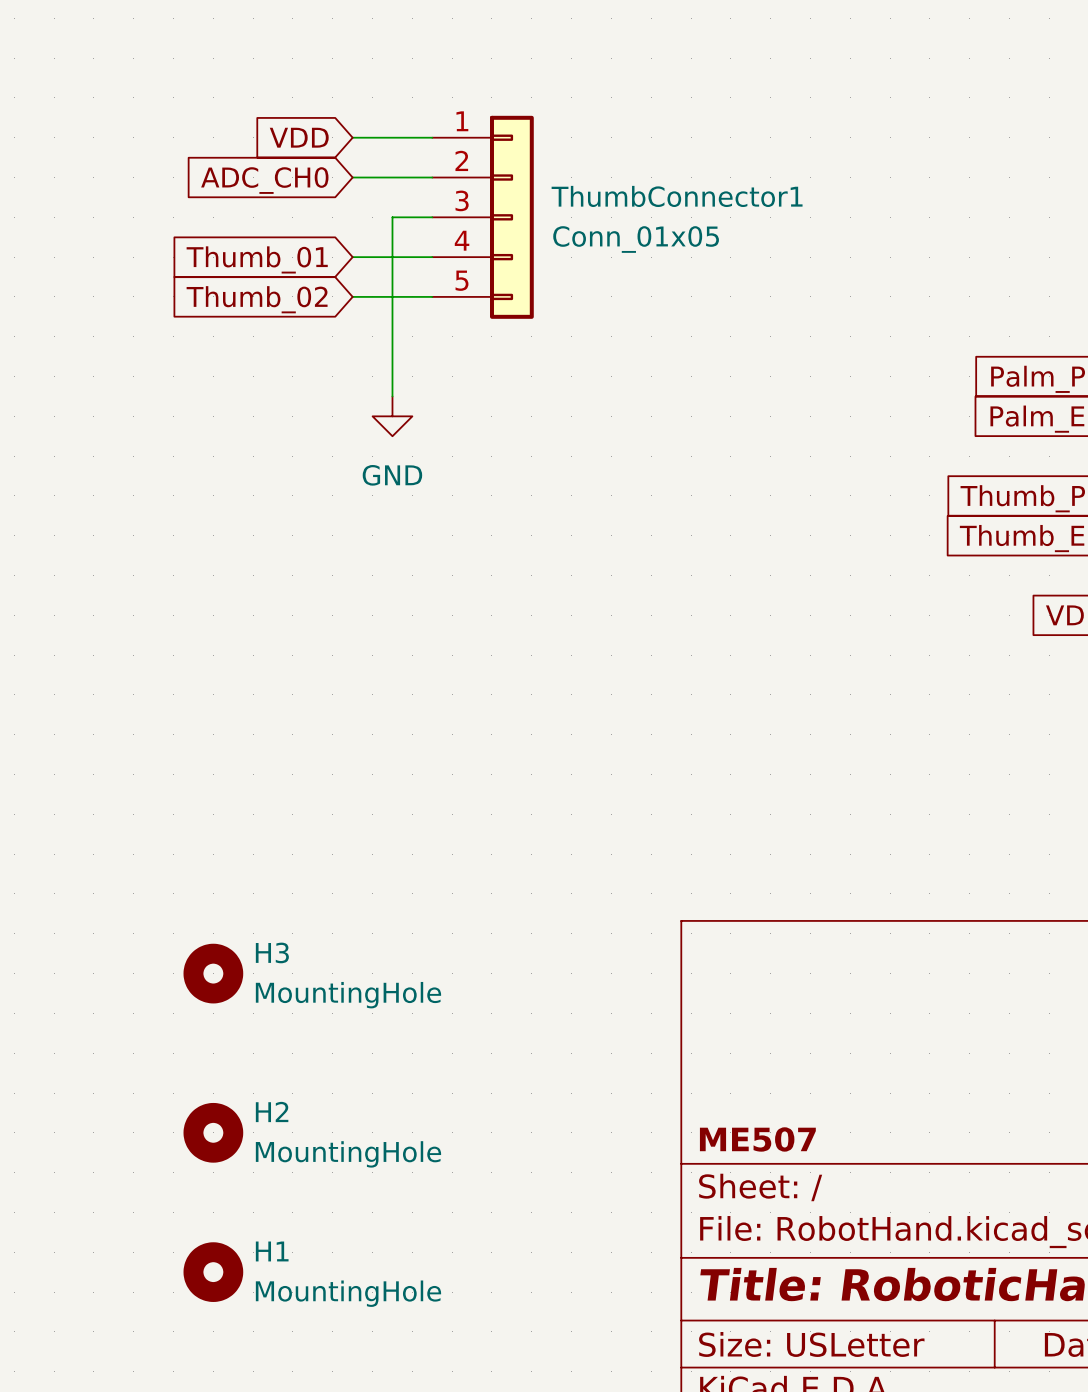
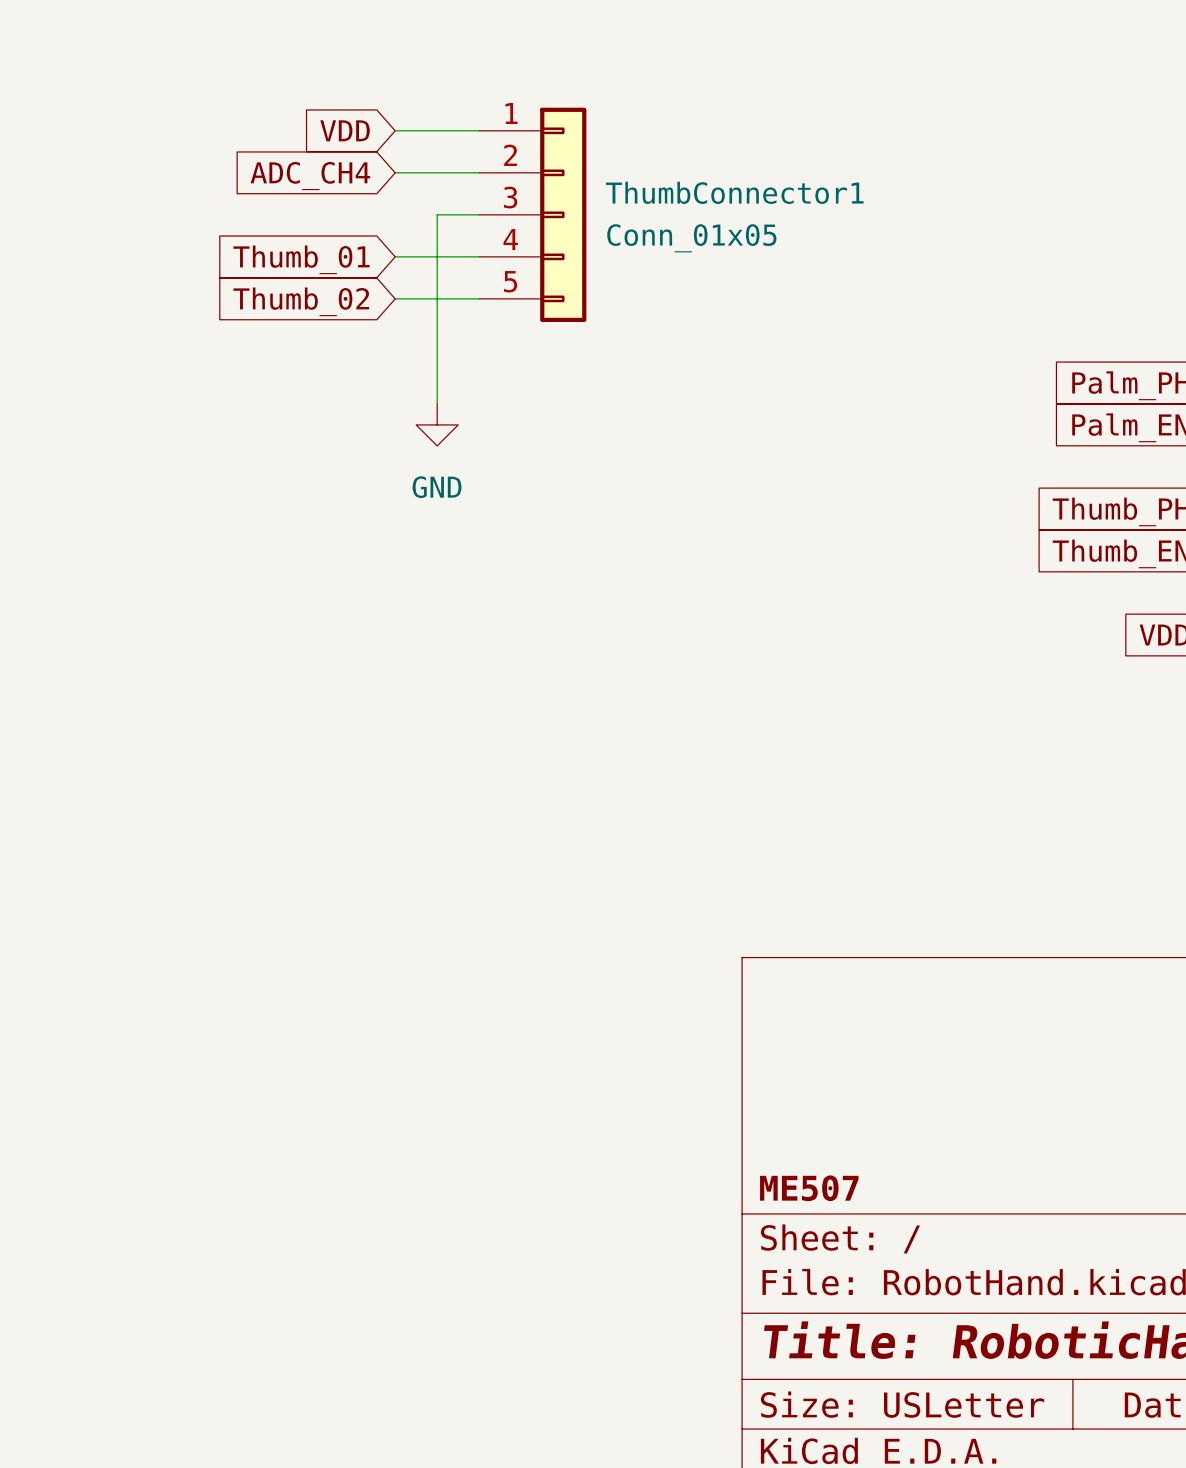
global label: ADC_CH0 (264, 180) -> ADC_CH4 (310, 176)
H3: MountingHole (213, 973) -> none
H2: MountingHole (213, 1132) -> none
H1: MountingHole (213, 1272) -> none

